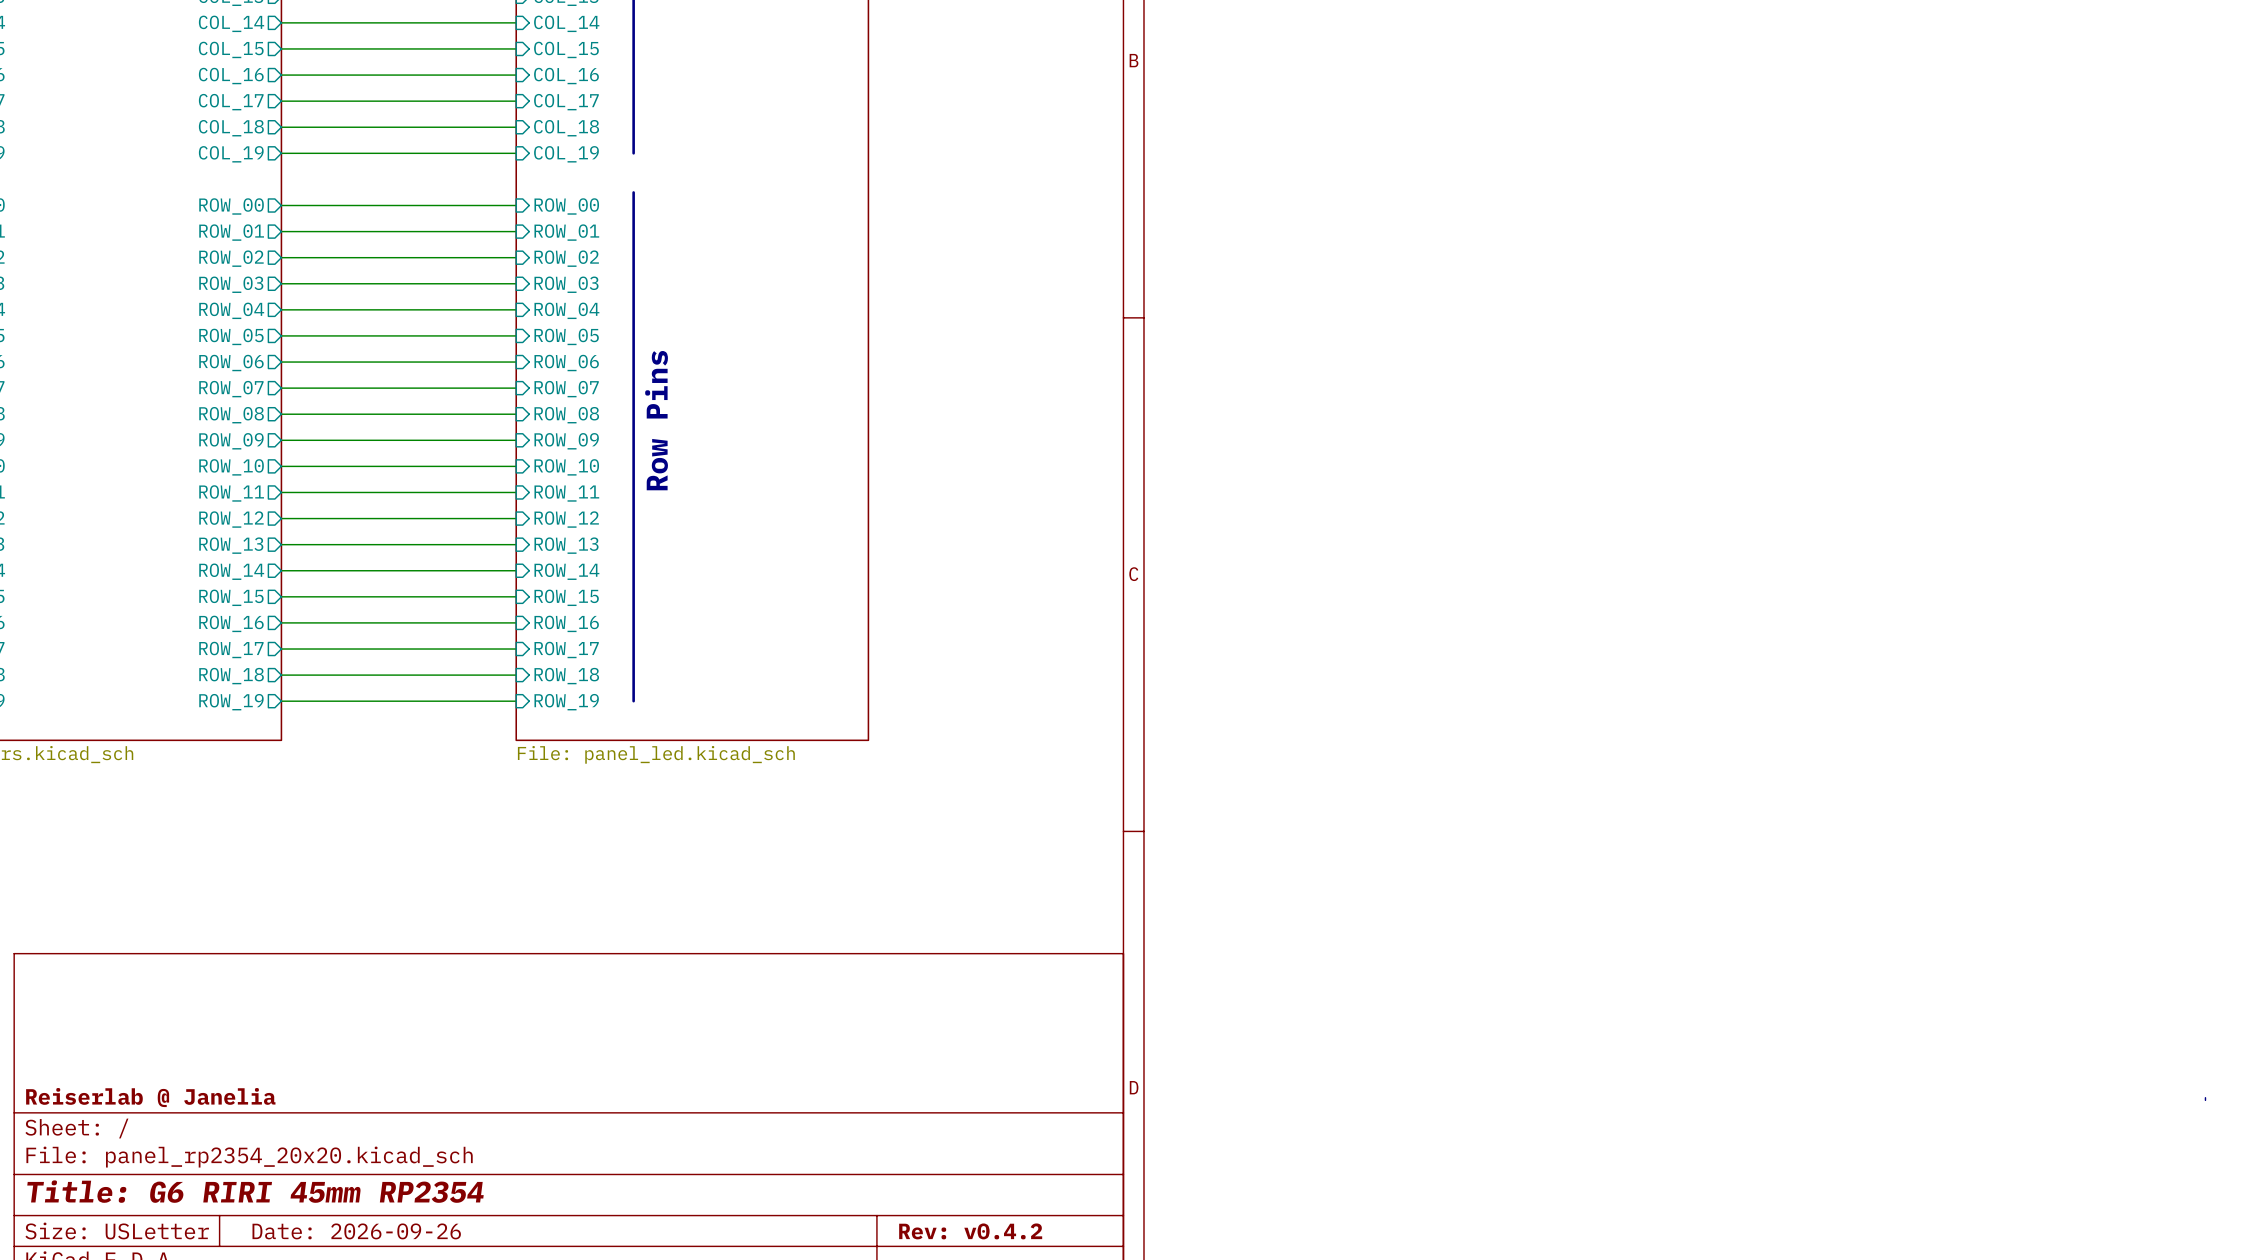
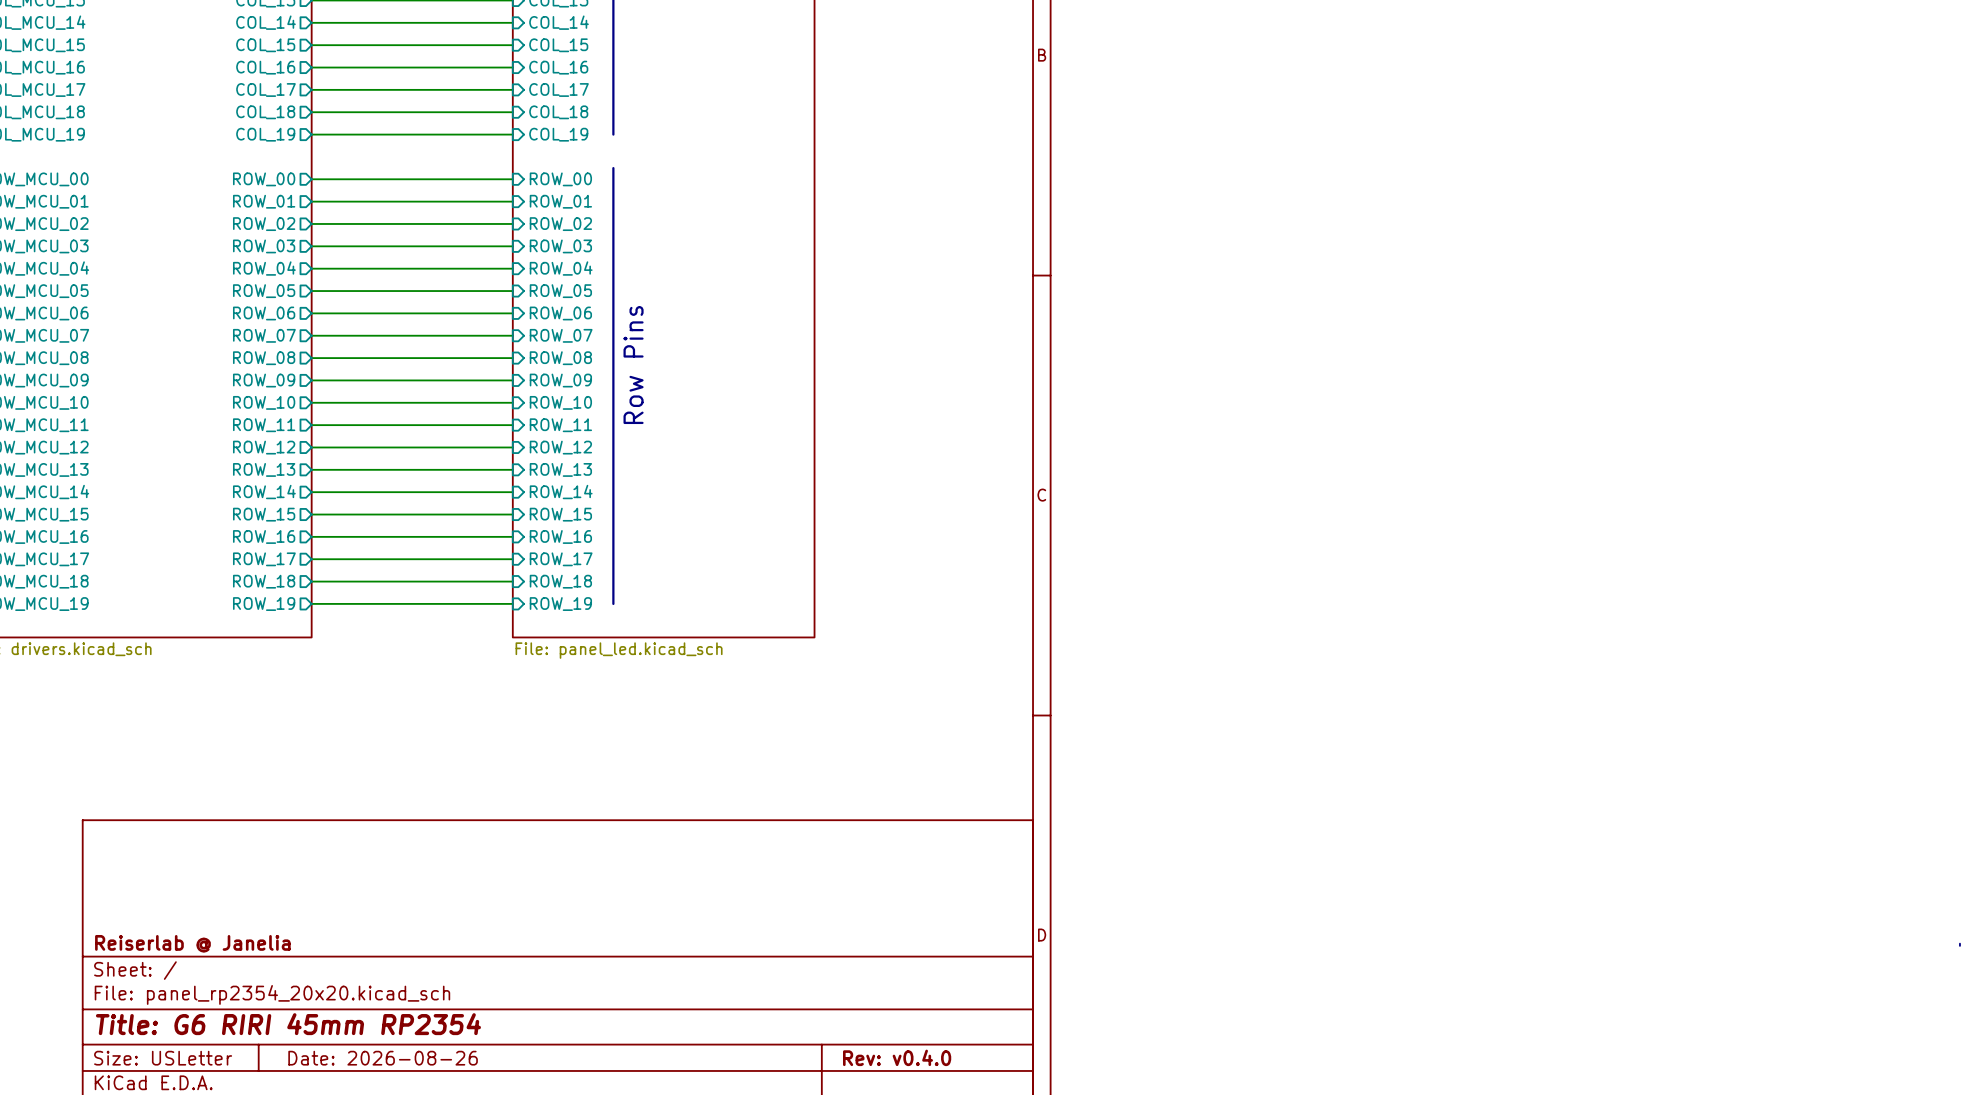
title block: Date: 2026-09-26 (356, 1231) -> Date: 2026-08-26 (383, 1058)
title block: Rev: v0.4.2 (970, 1231) -> Rev: v0.4.0 (897, 1057)

